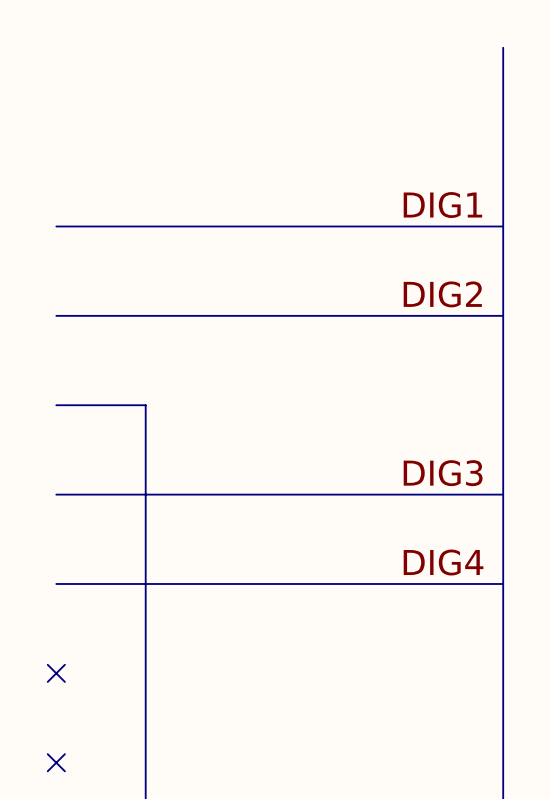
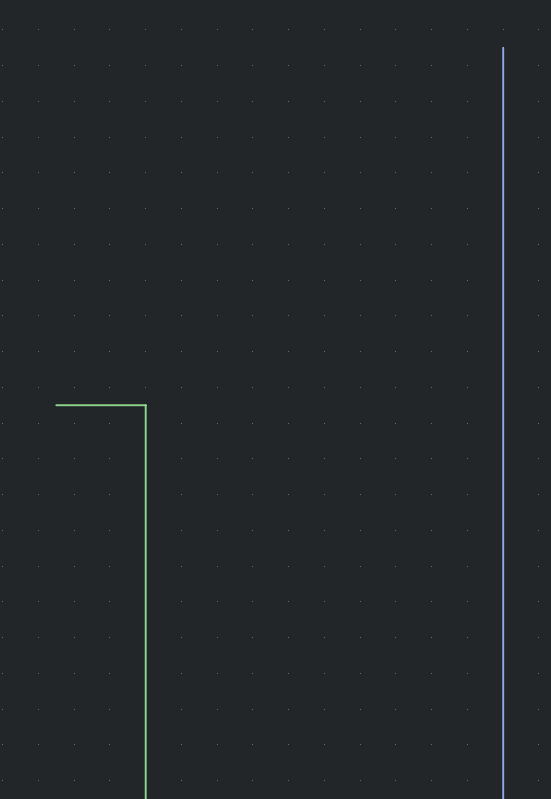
label: DIG1 (442, 205) -> none
wire: (56, 226) (503, 226) -> none
label: DIG2 (442, 294) -> none
wire: (56, 315) (503, 315) -> none
label: DIG3 (443, 473) -> none
wire: (56, 494) (503, 494) -> none
label: DIG4 (443, 562) -> none
wire: (56, 583) (503, 583) -> none
no-connect mark: (56, 673) -> none
no-connect mark: (56, 762) -> none

